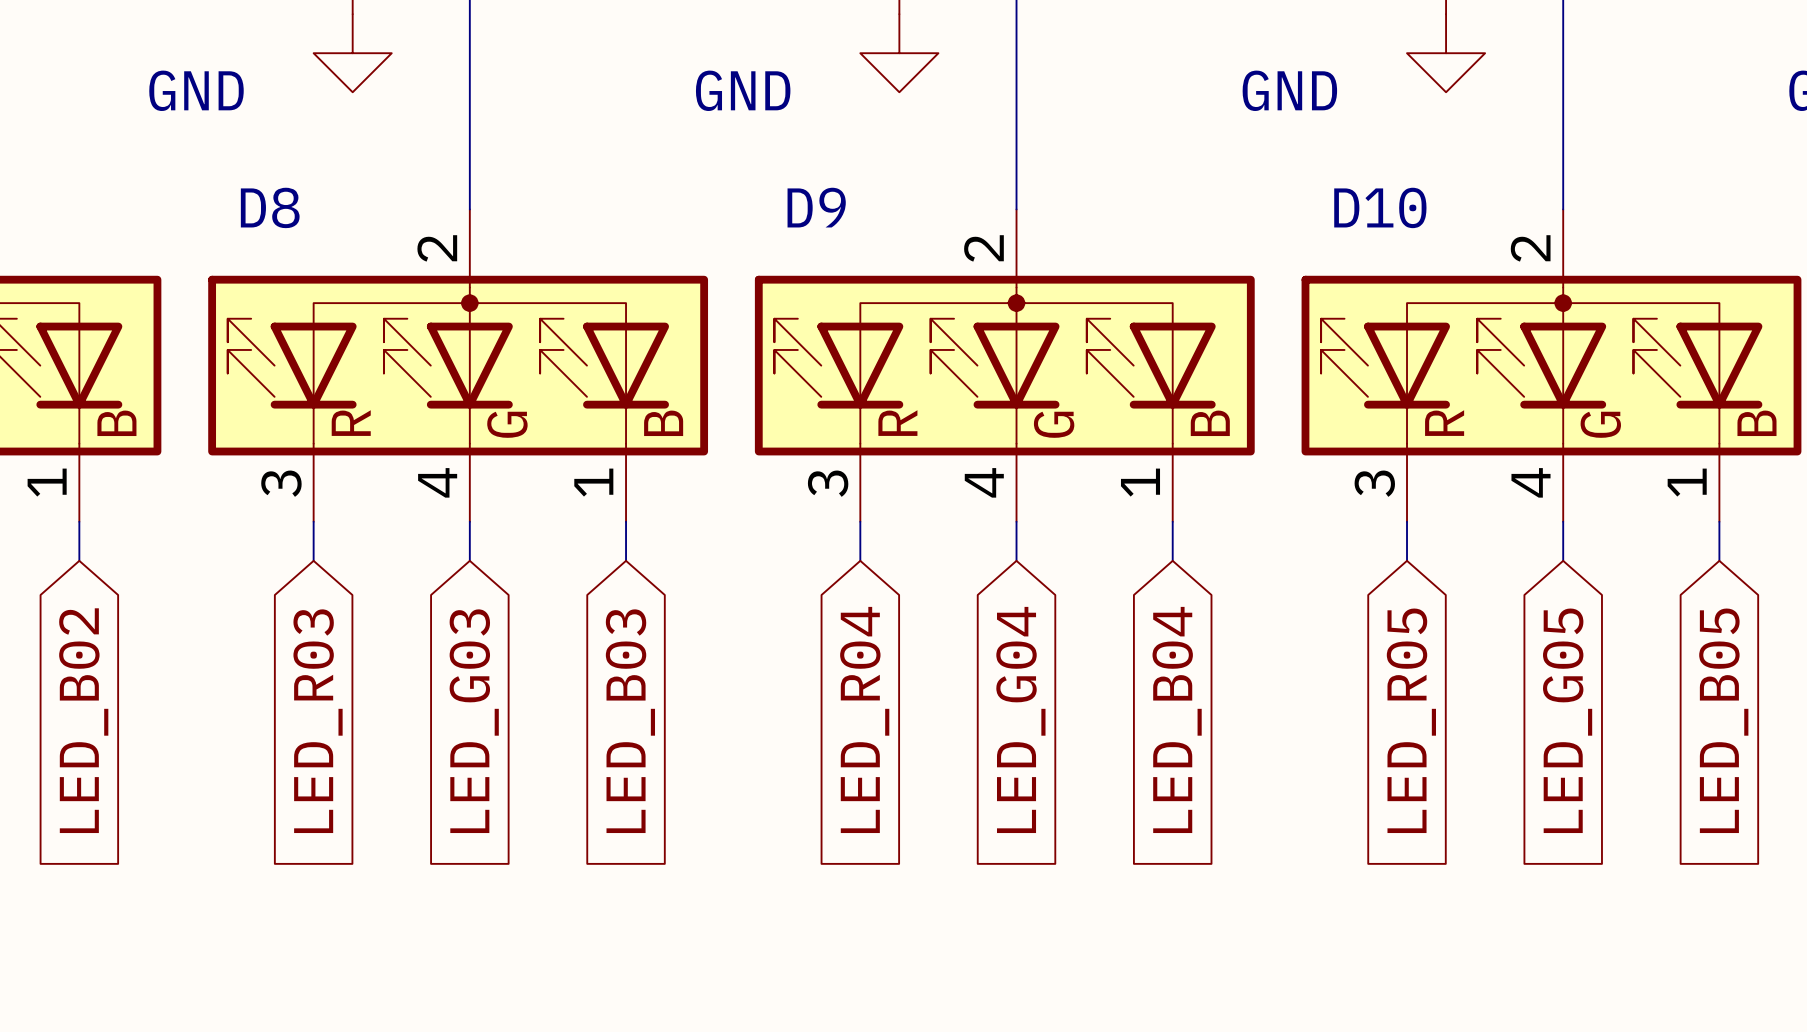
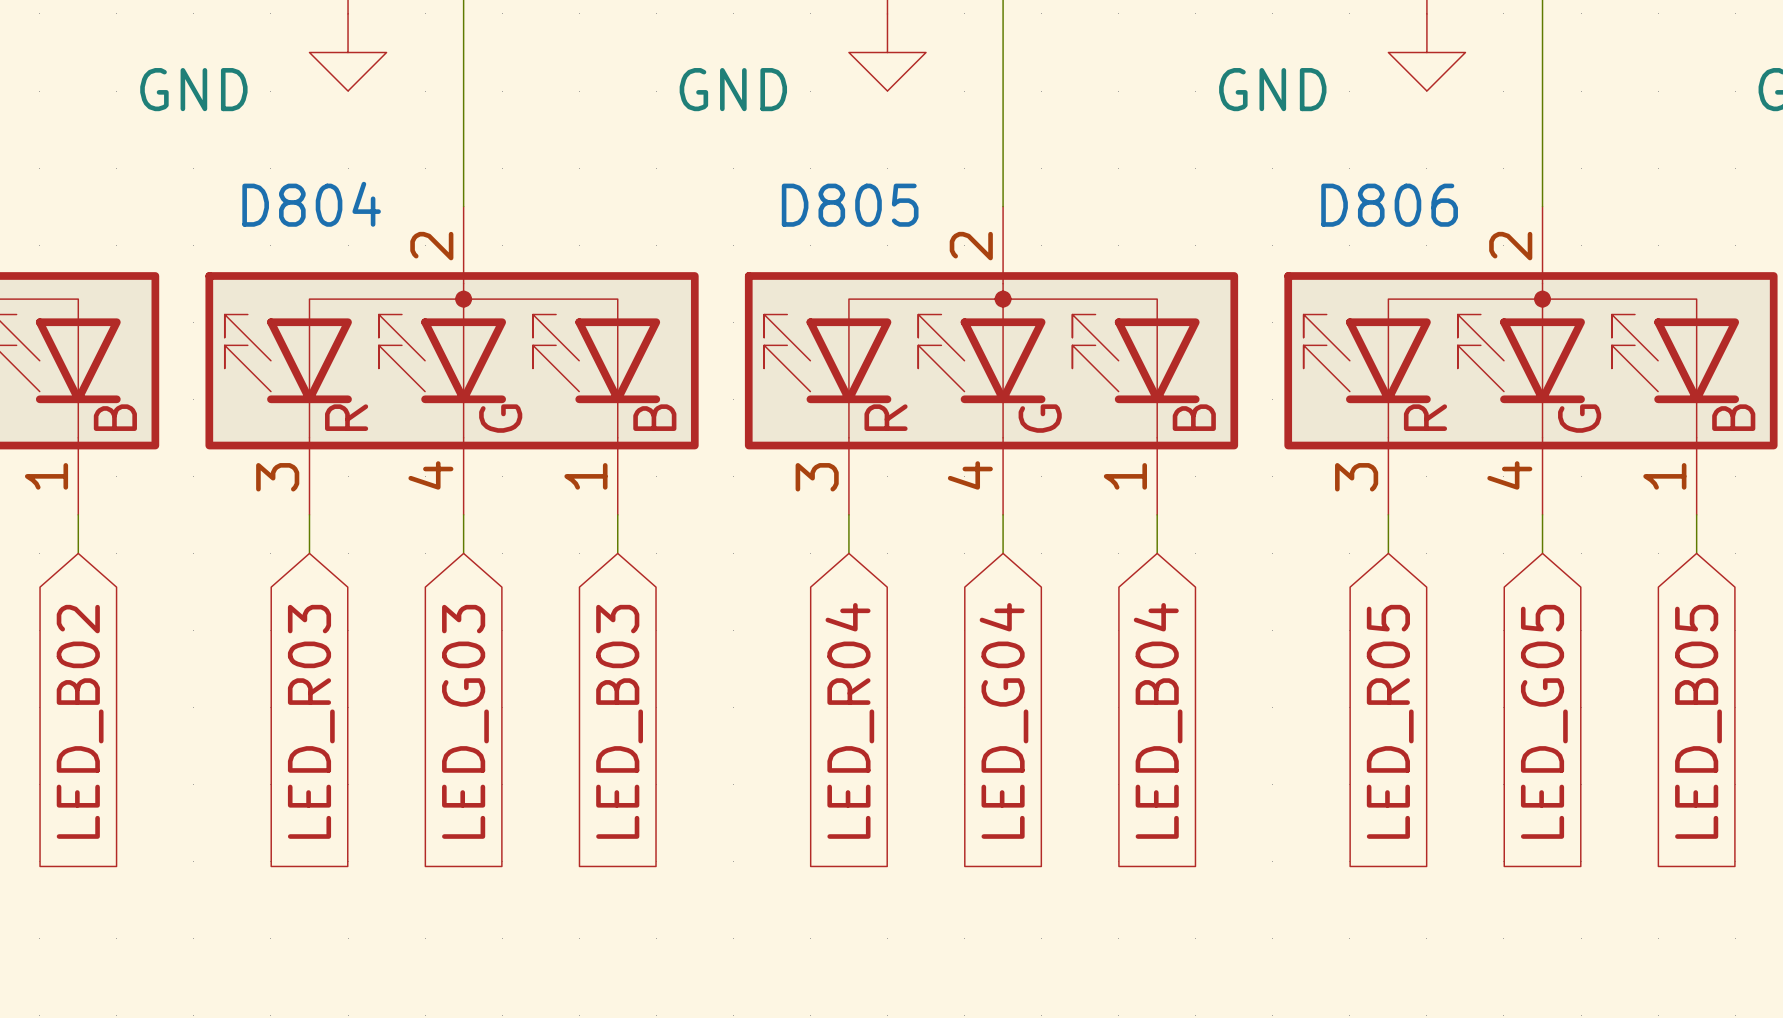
D8 name: D8 (270, 207) -> D804 (311, 204)
D9 name: D9 (816, 207) -> D805 (850, 205)
D10 name: D10 (1380, 207) -> D806 (1389, 205)

